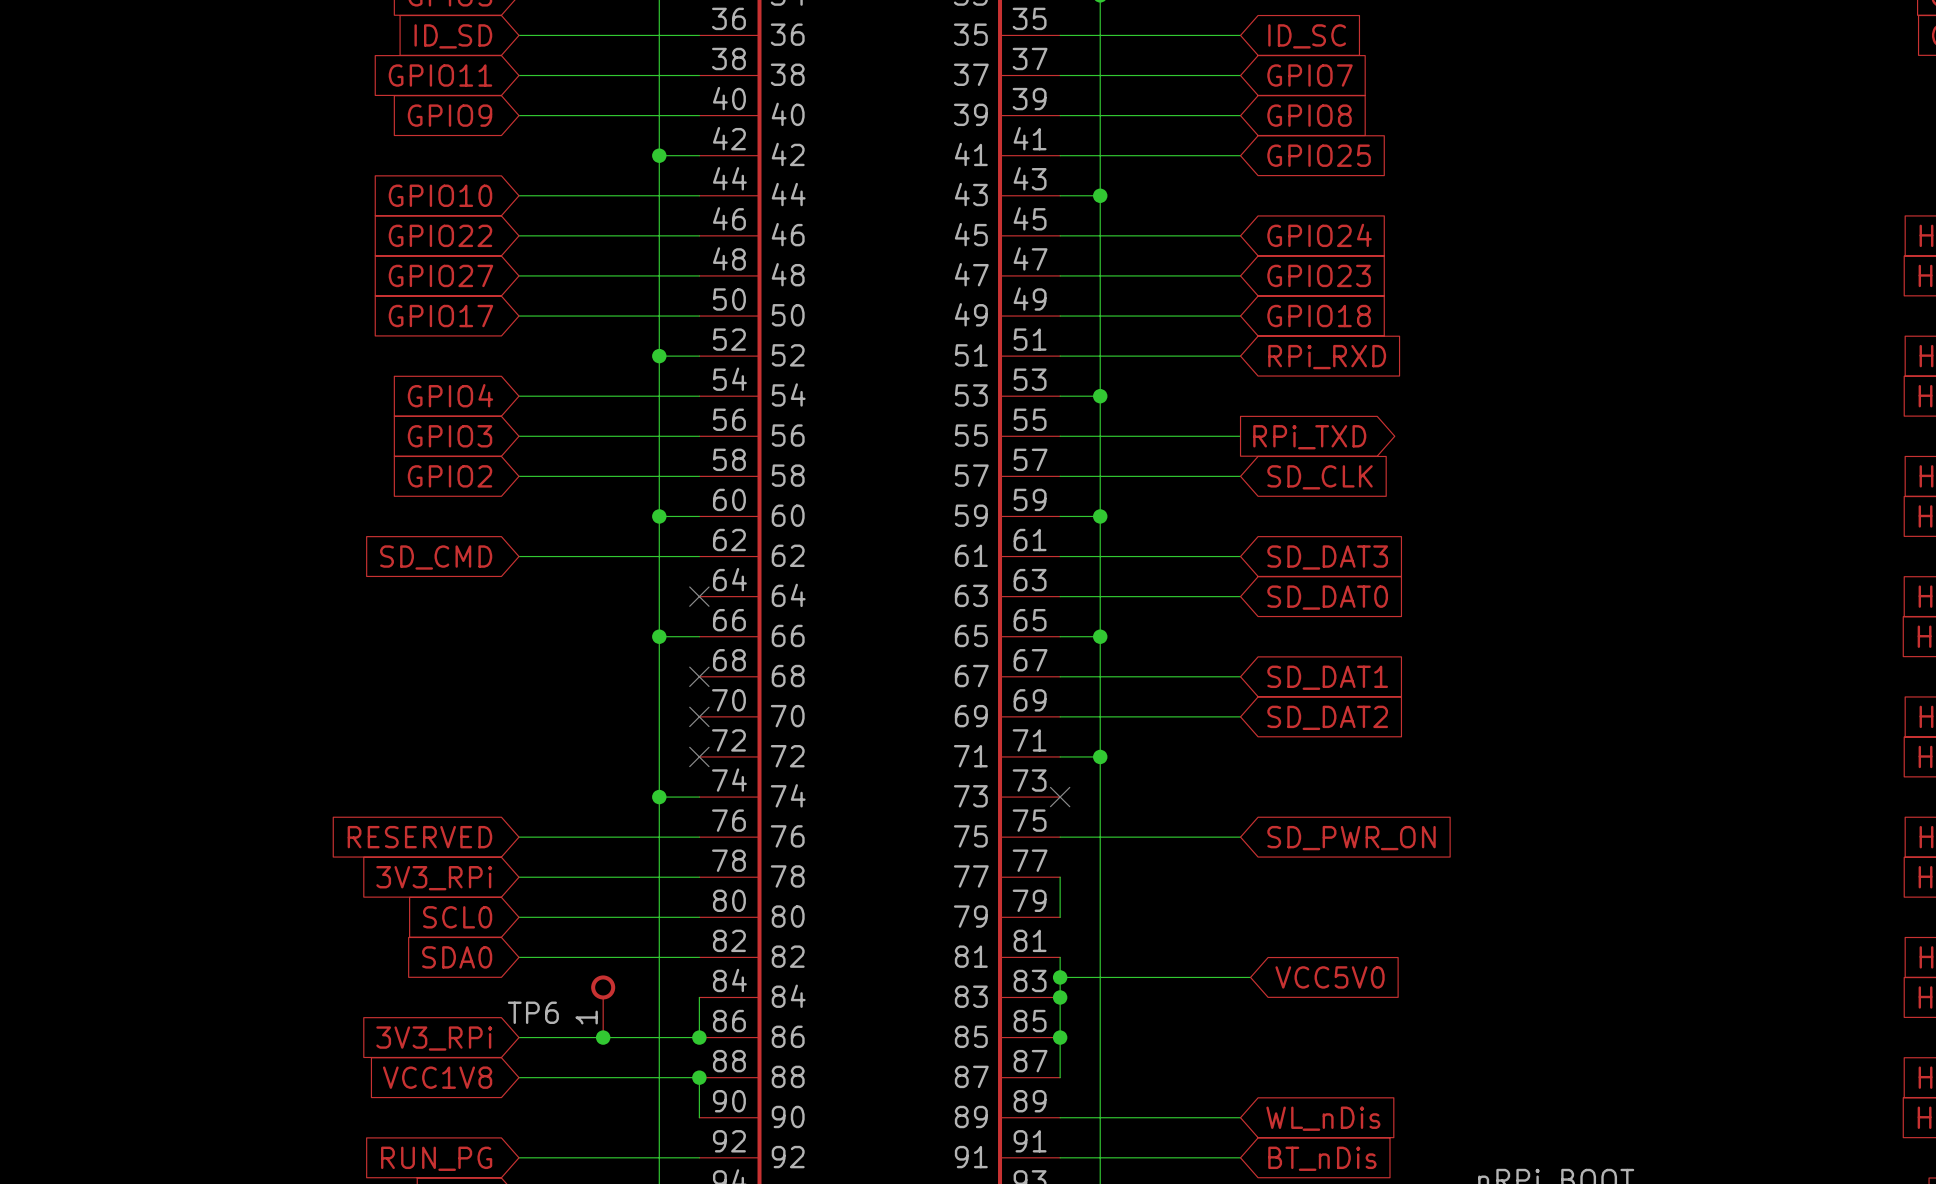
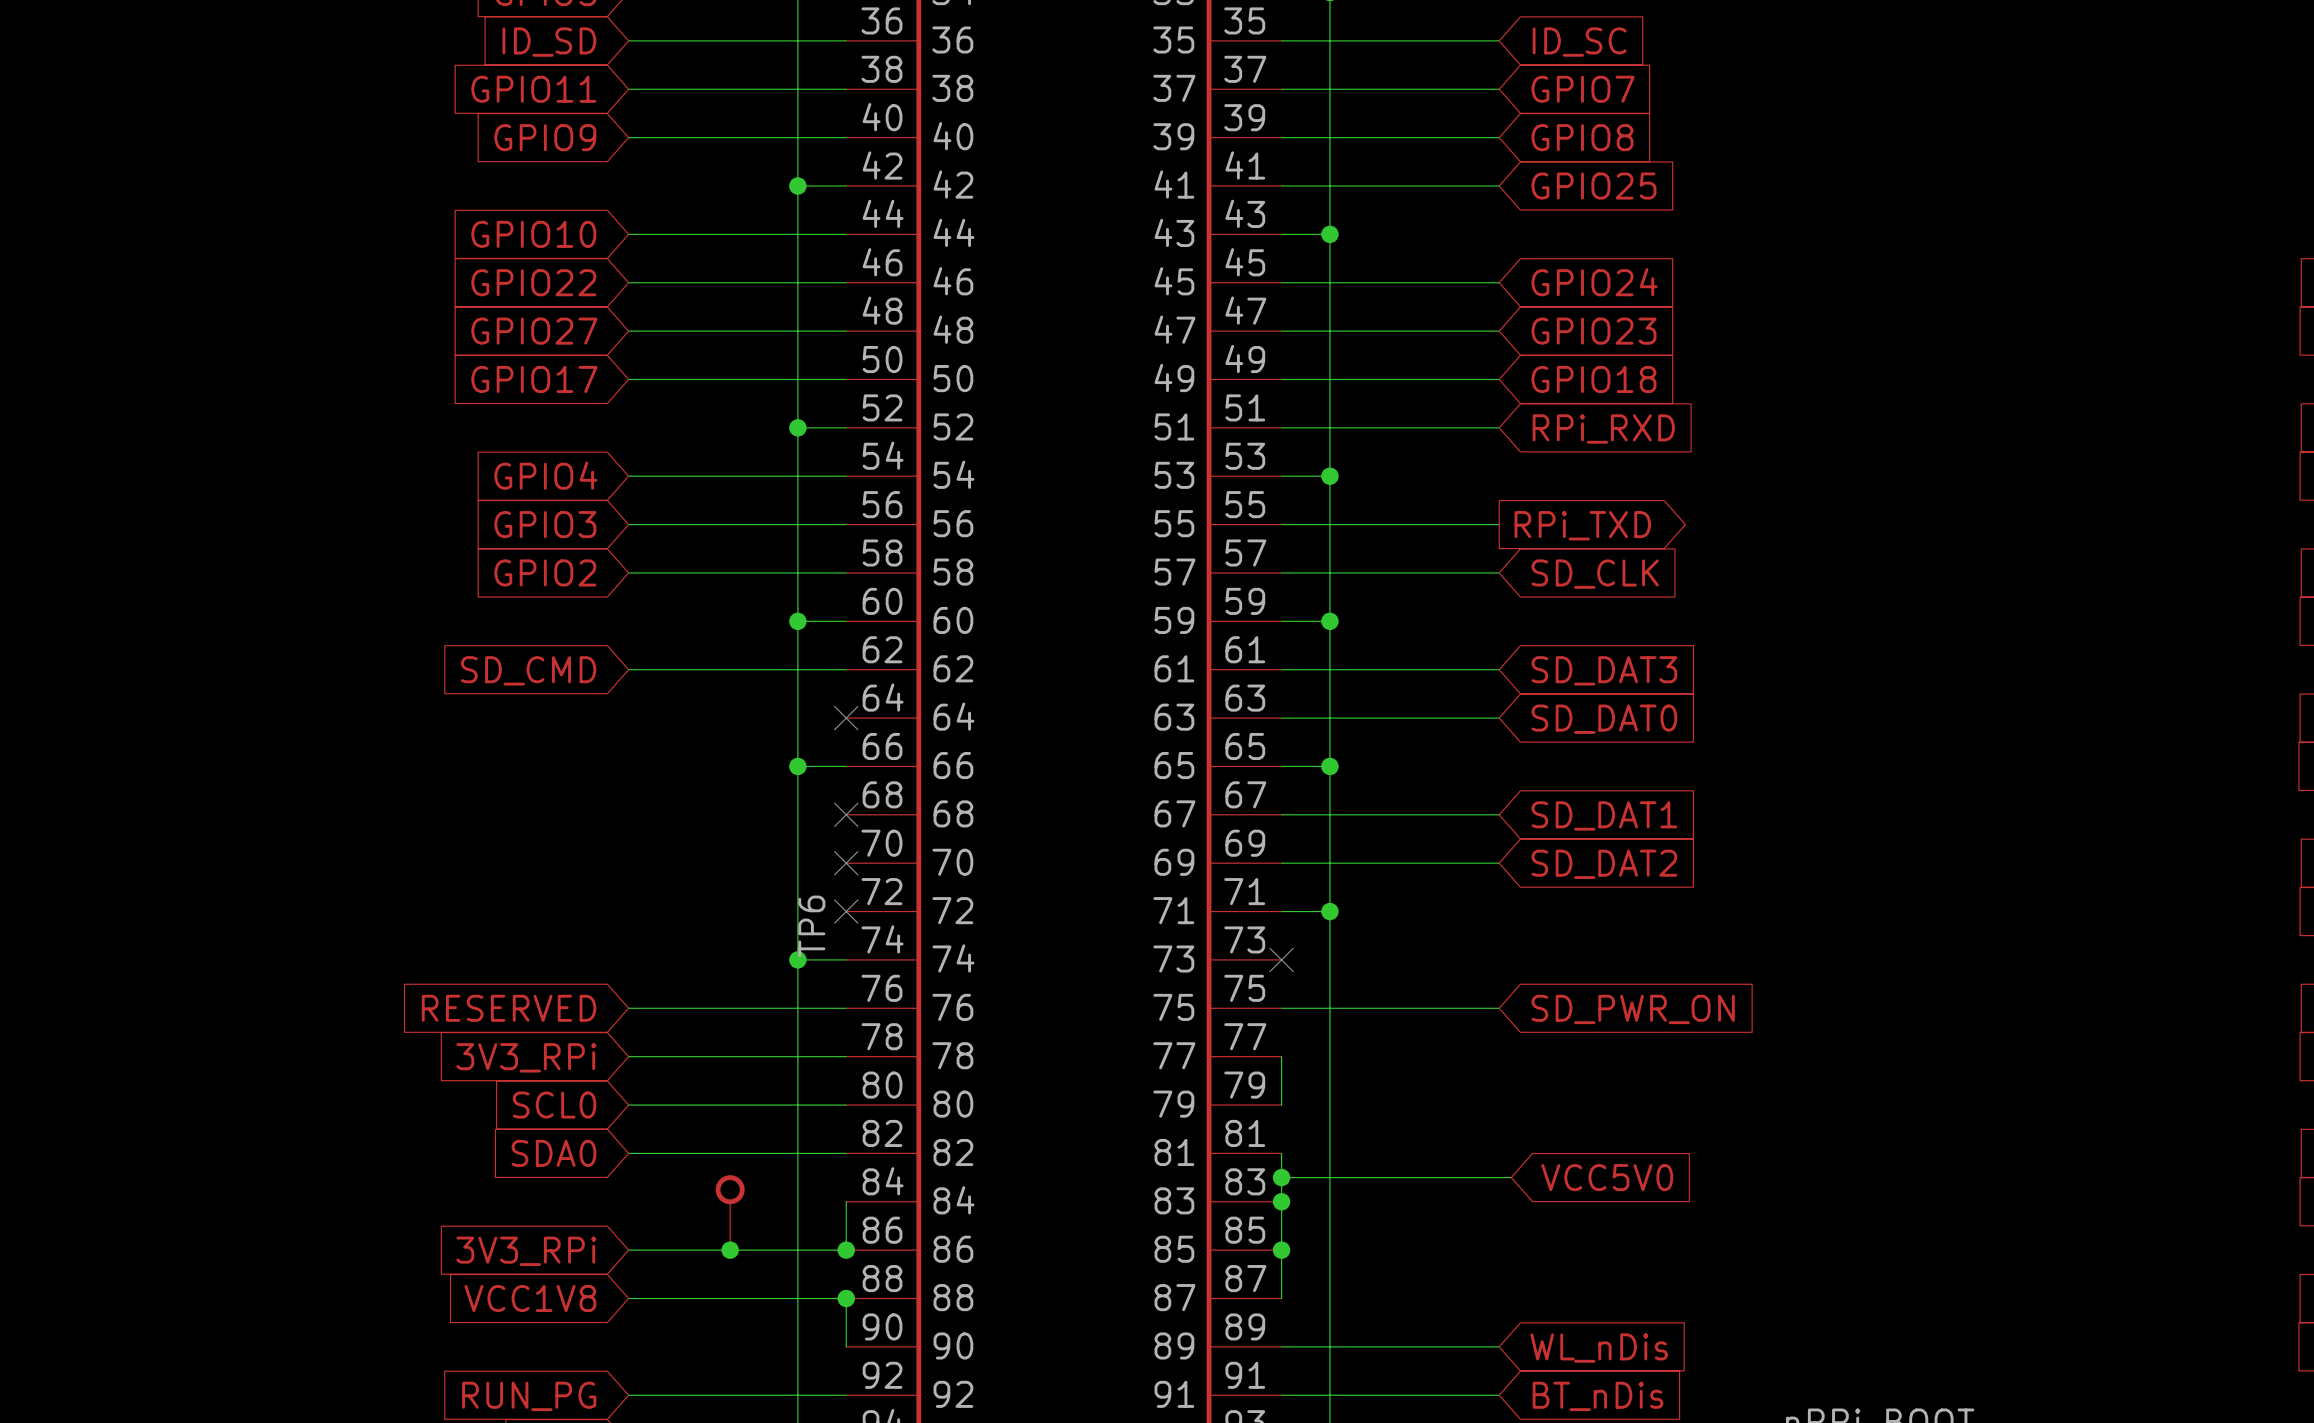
TP6 name rotation: 0° (533, 1012) -> 90° counterclockwise (811, 926)
TP6 name position: TP6 (533, 1012) -> TP6 (811, 926)
TP6 pin number: 1 (586, 1017) -> none

